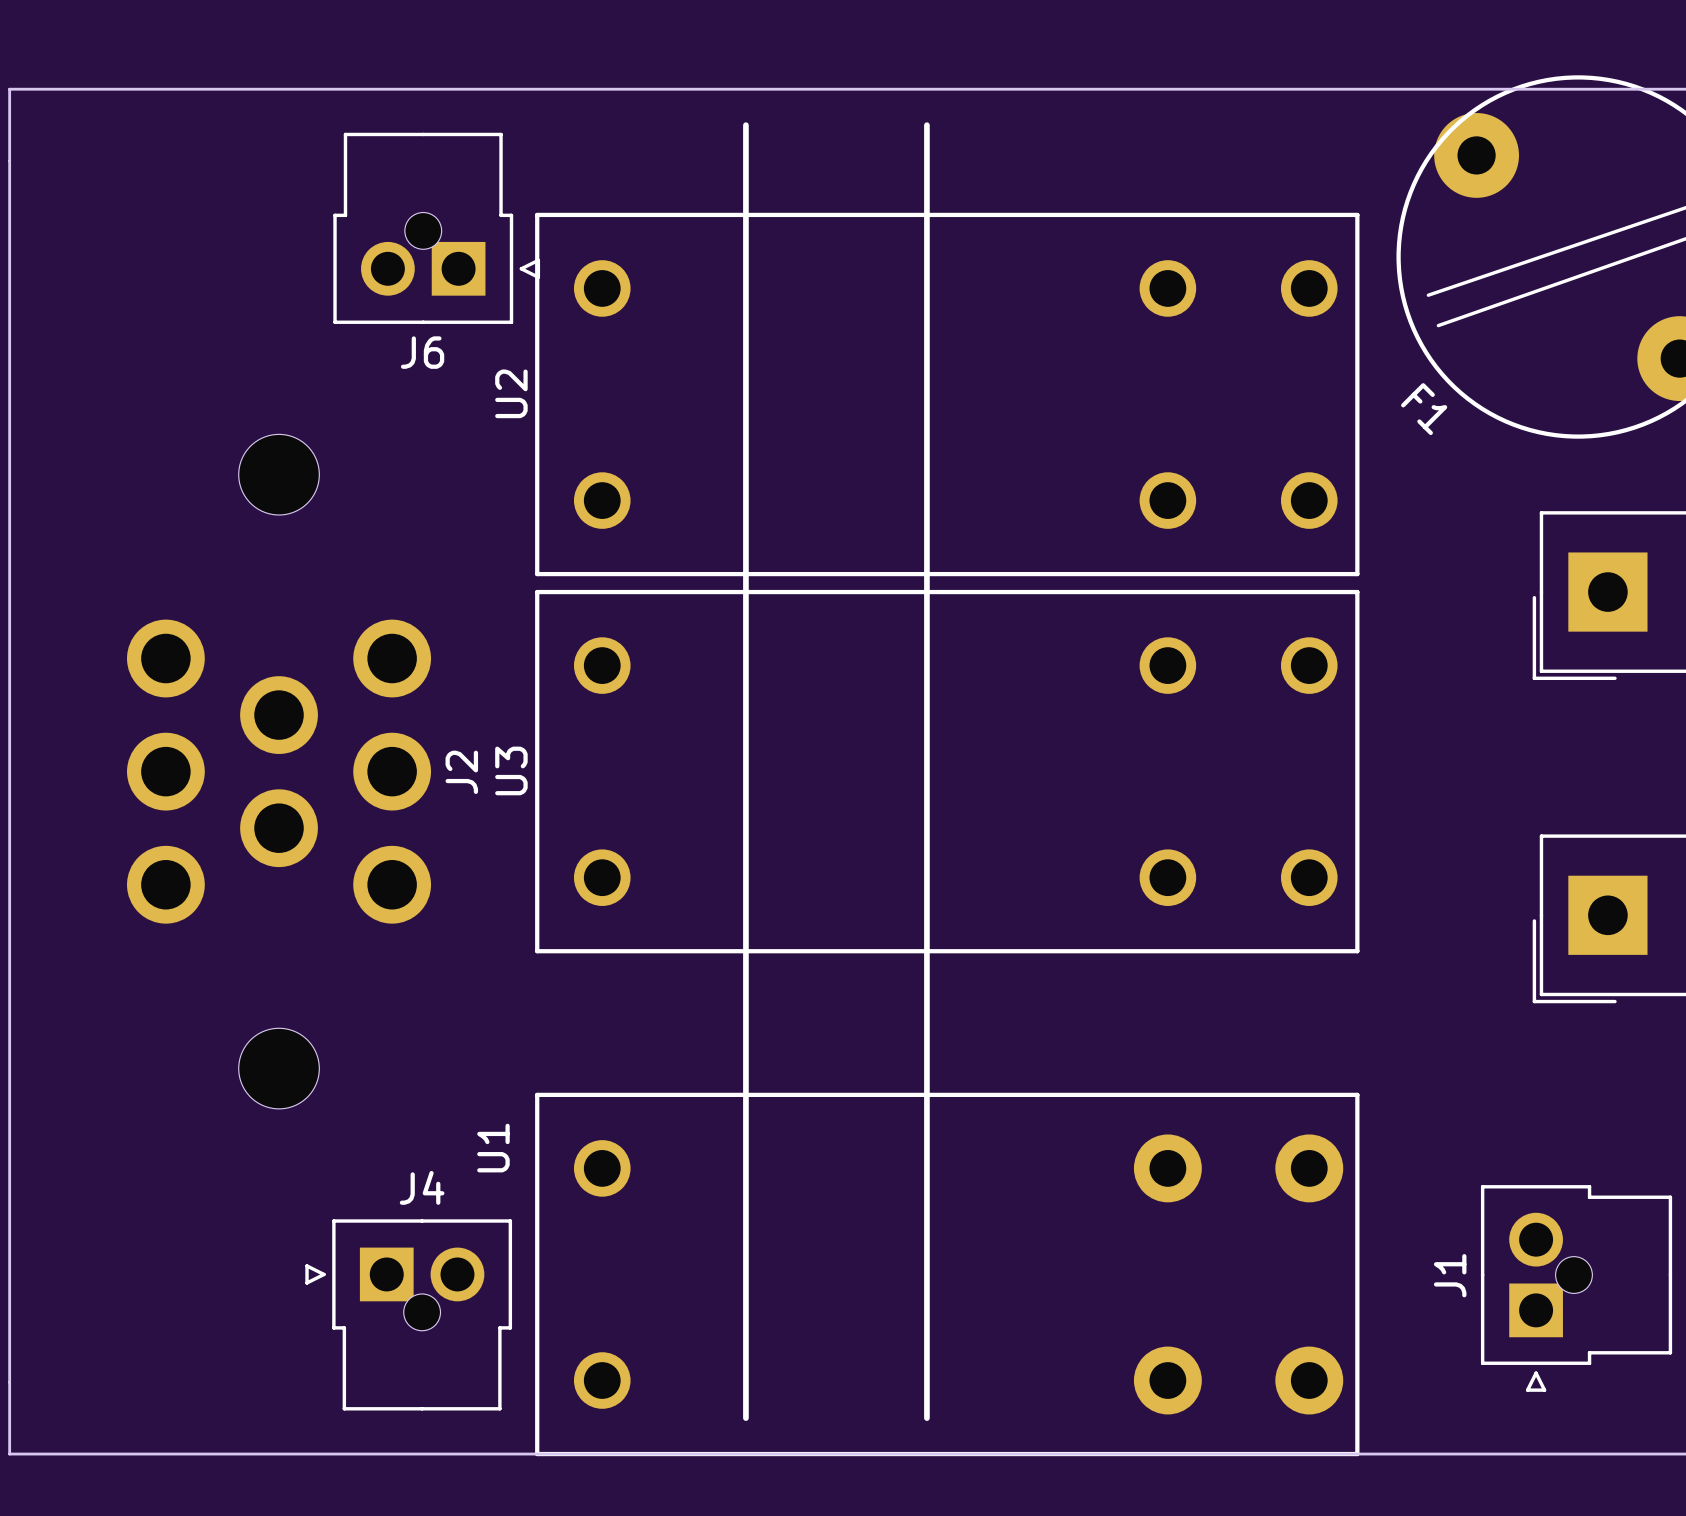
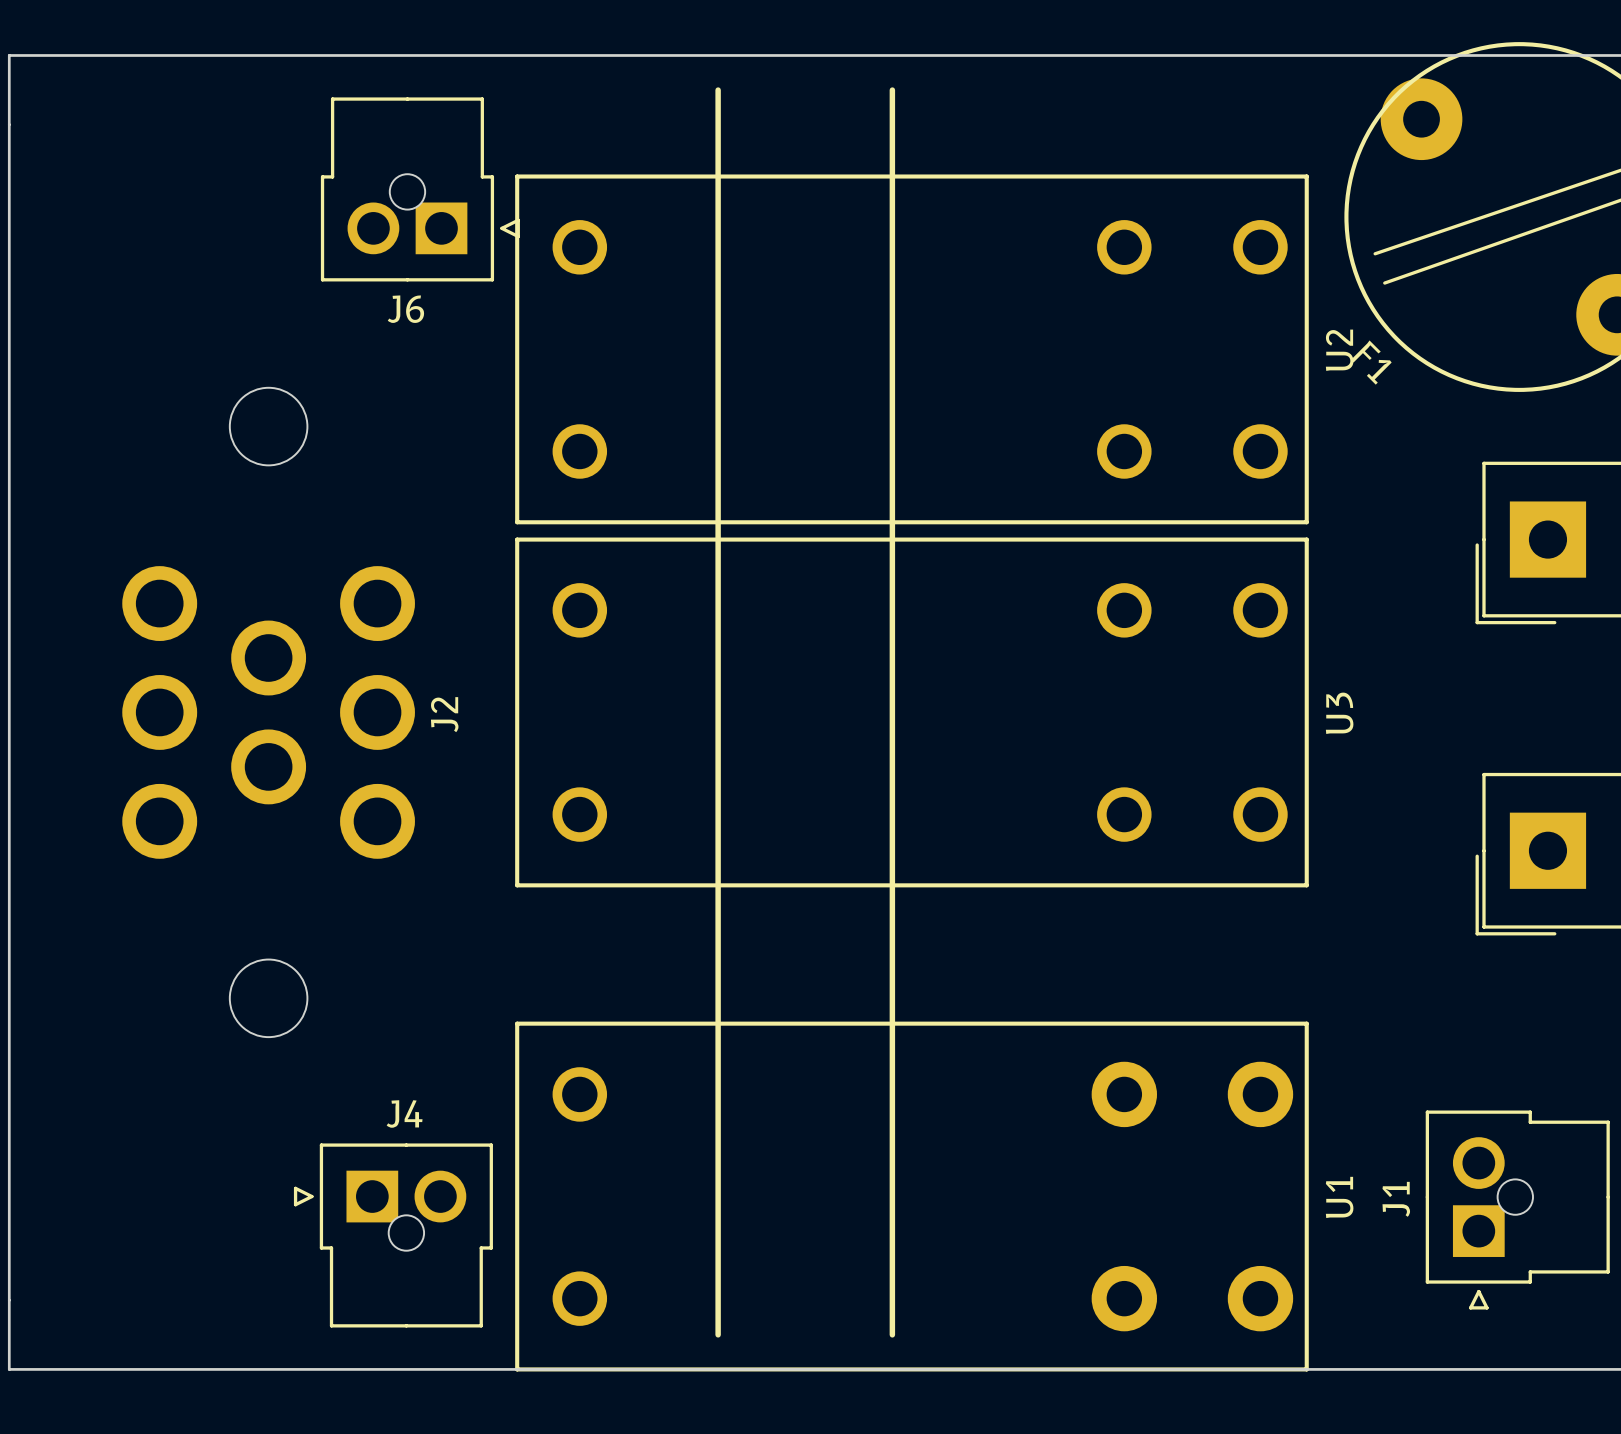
U2 name position: U2 (511, 393) -> U2 (1339, 350)
U3 name position: U3 (511, 770) -> U3 (1339, 713)
U1 name position: U1 (493, 1148) -> U1 (1339, 1197)

